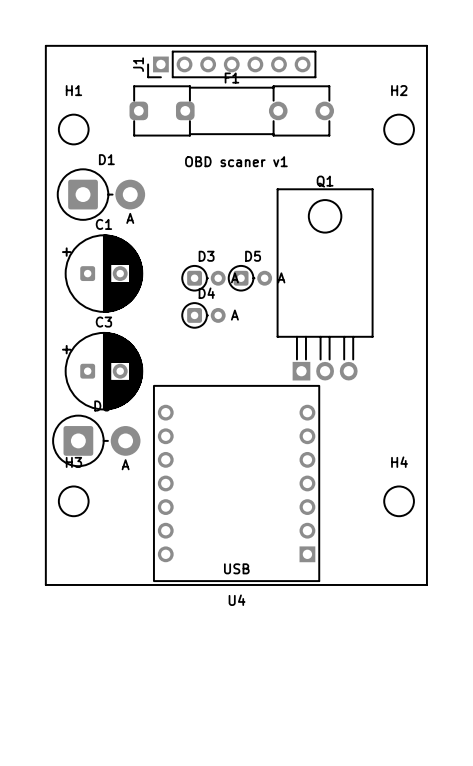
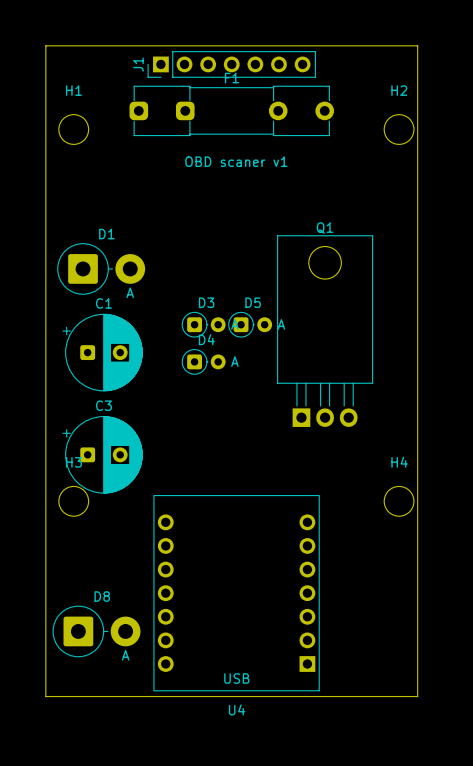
board edge: (417, 45) (426, 45) (426, 584) (45, 584) -> (417, 45) (417, 696) (45, 696) (45, 584)
D1 position: (101, 194) -> (101, 268)
C1 position: (102, 273) -> (102, 352)
D3 position: (203, 278) -> (203, 324)
D5 position: (250, 278) -> (250, 324)
Q1 position: (325, 284) -> (325, 331)
D4 position: (203, 315) -> (203, 361)
C3 position: (102, 371) -> (102, 454)
D8 position: (96, 440) -> (96, 631)
U4 position: (236, 483) -> (236, 593)

